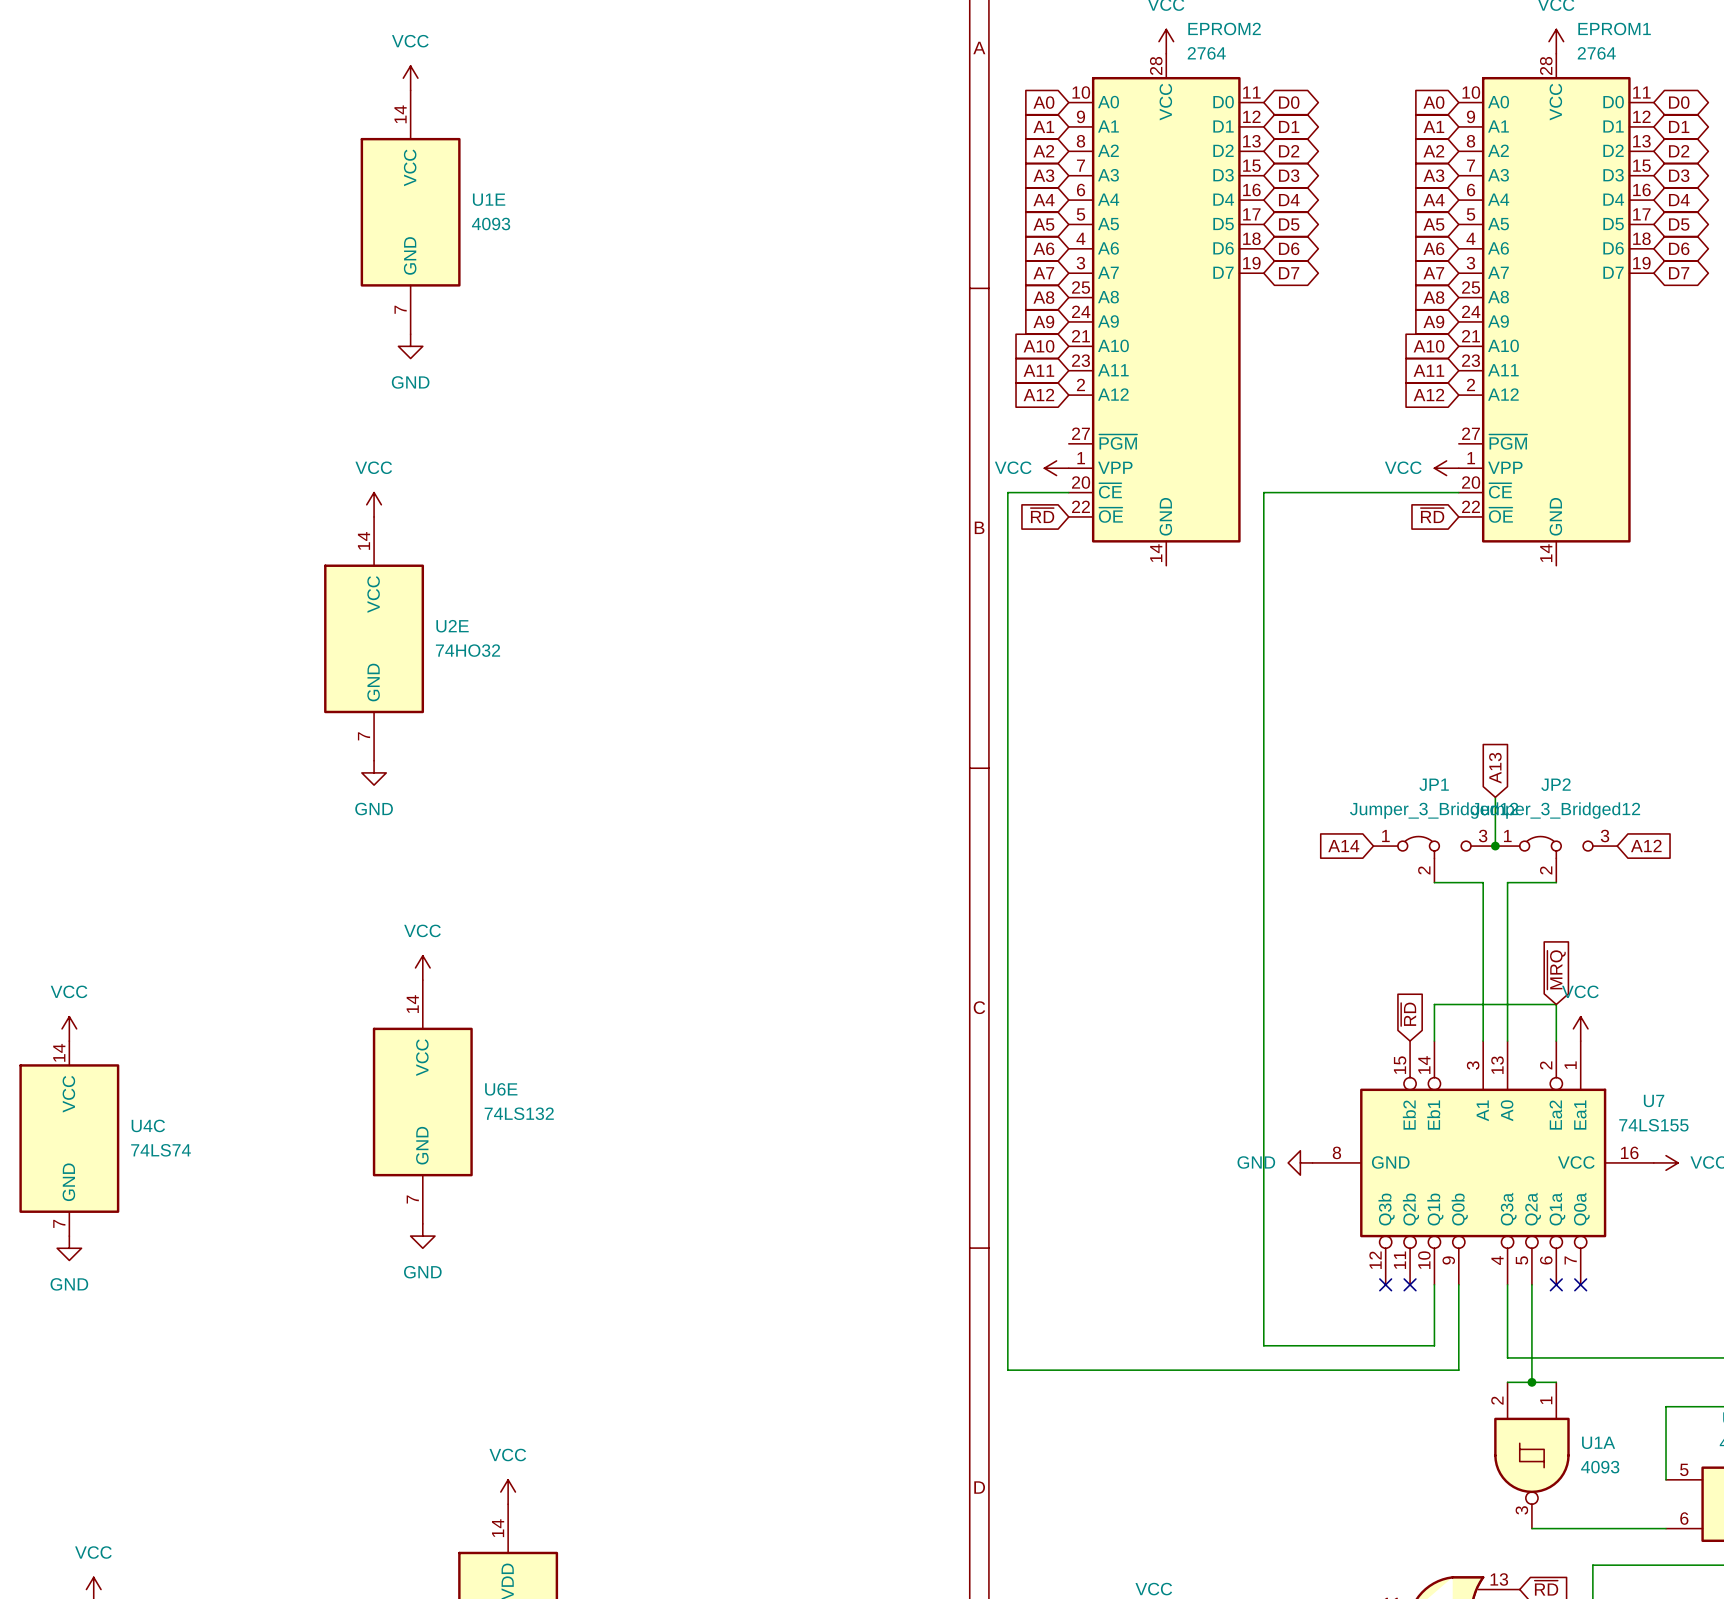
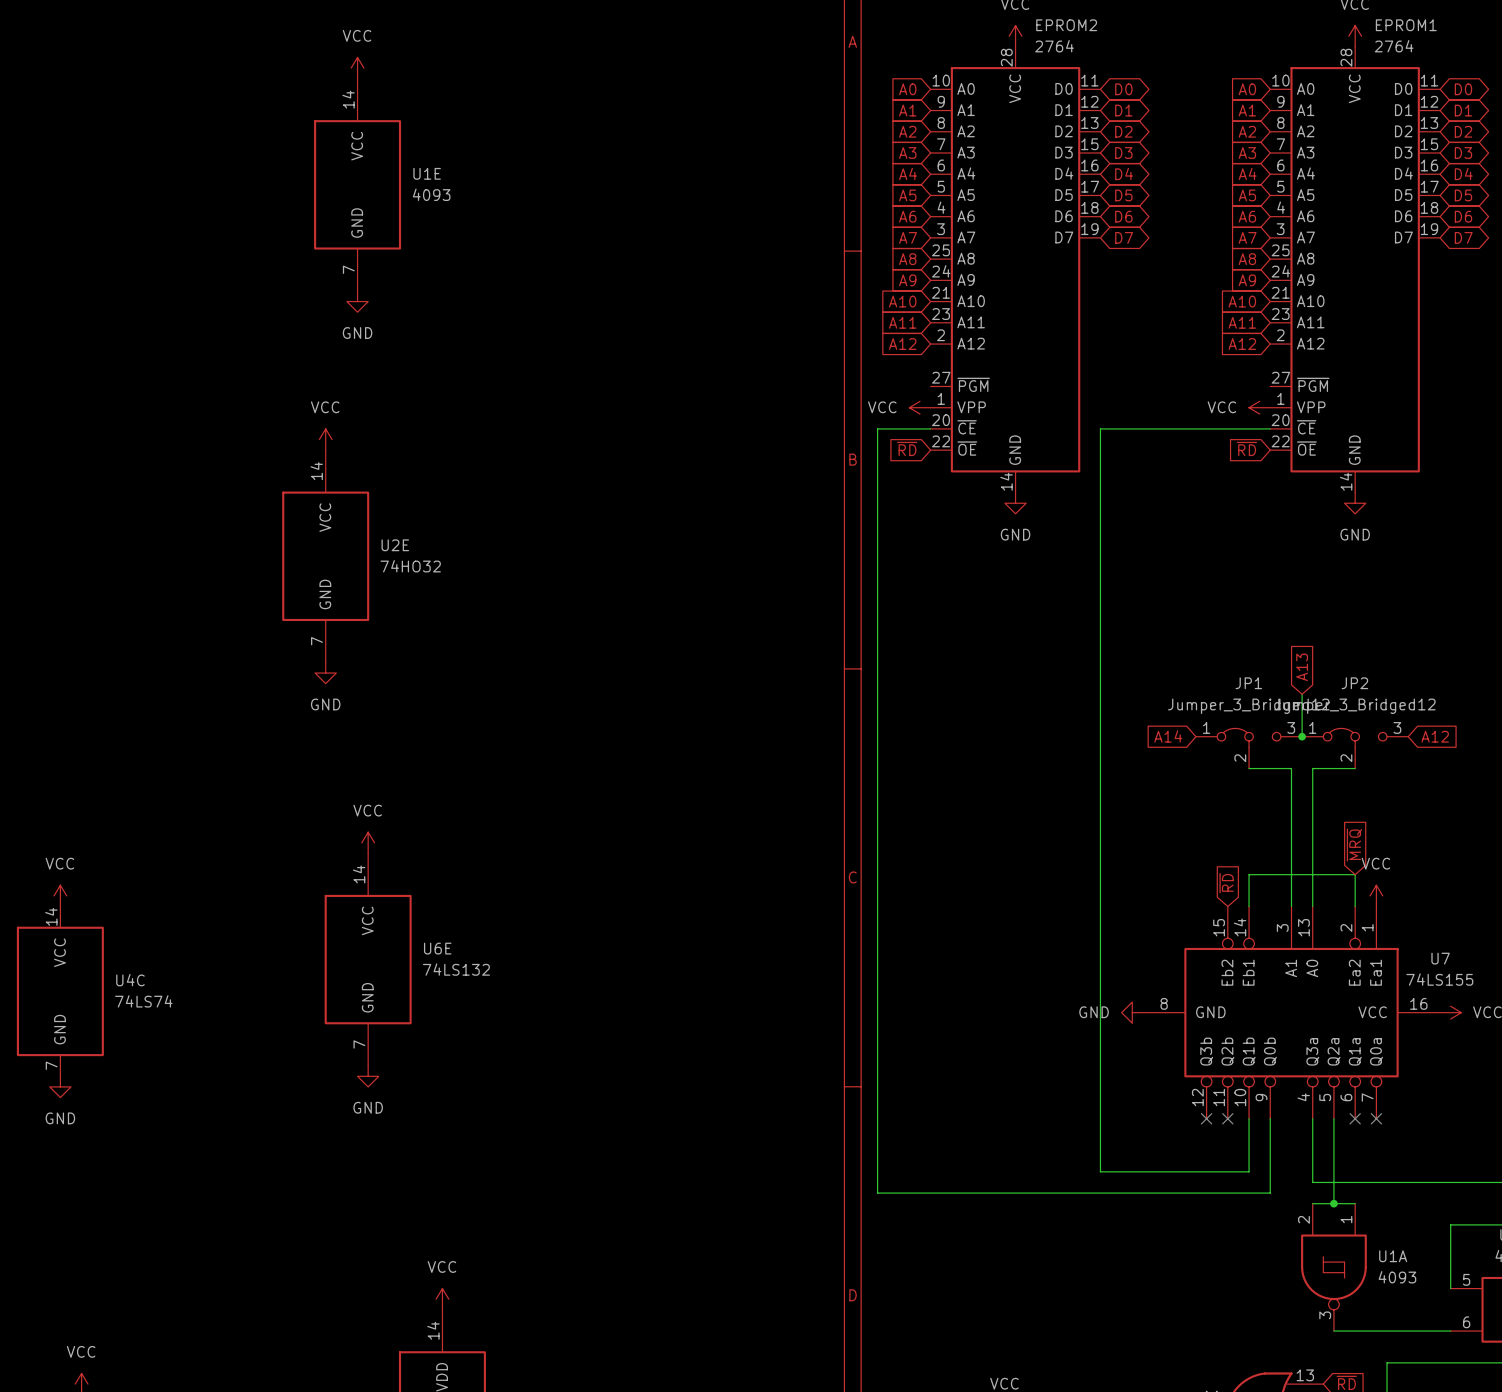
power symbol: none -> GND (1015, 503)
power symbol: none -> GND (1355, 503)

